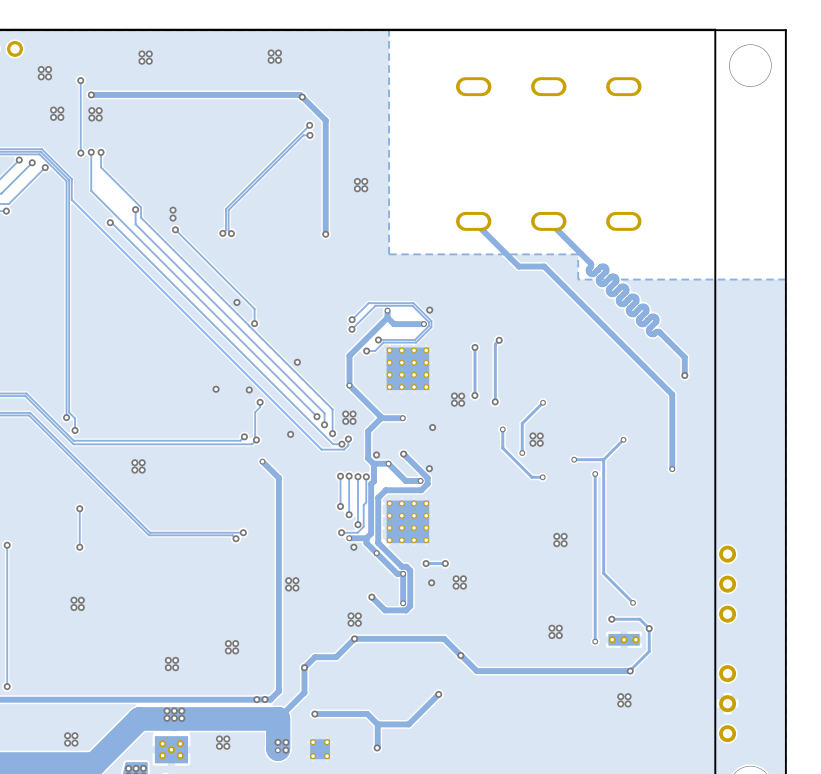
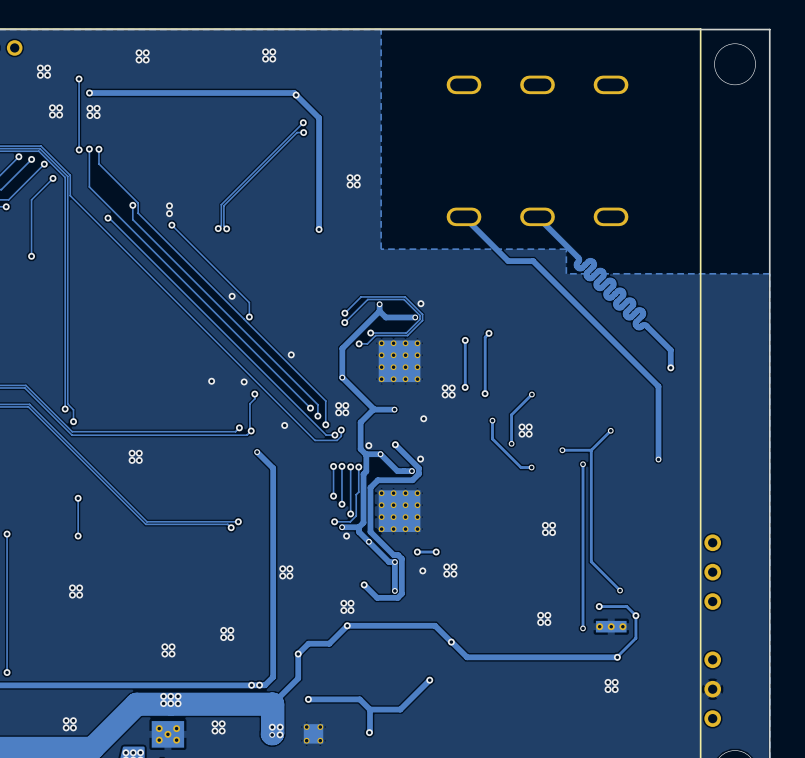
track: none -> (53, 178) (31, 199) (31, 256)
via: none -> (53, 178)
via: none -> (31, 256)

